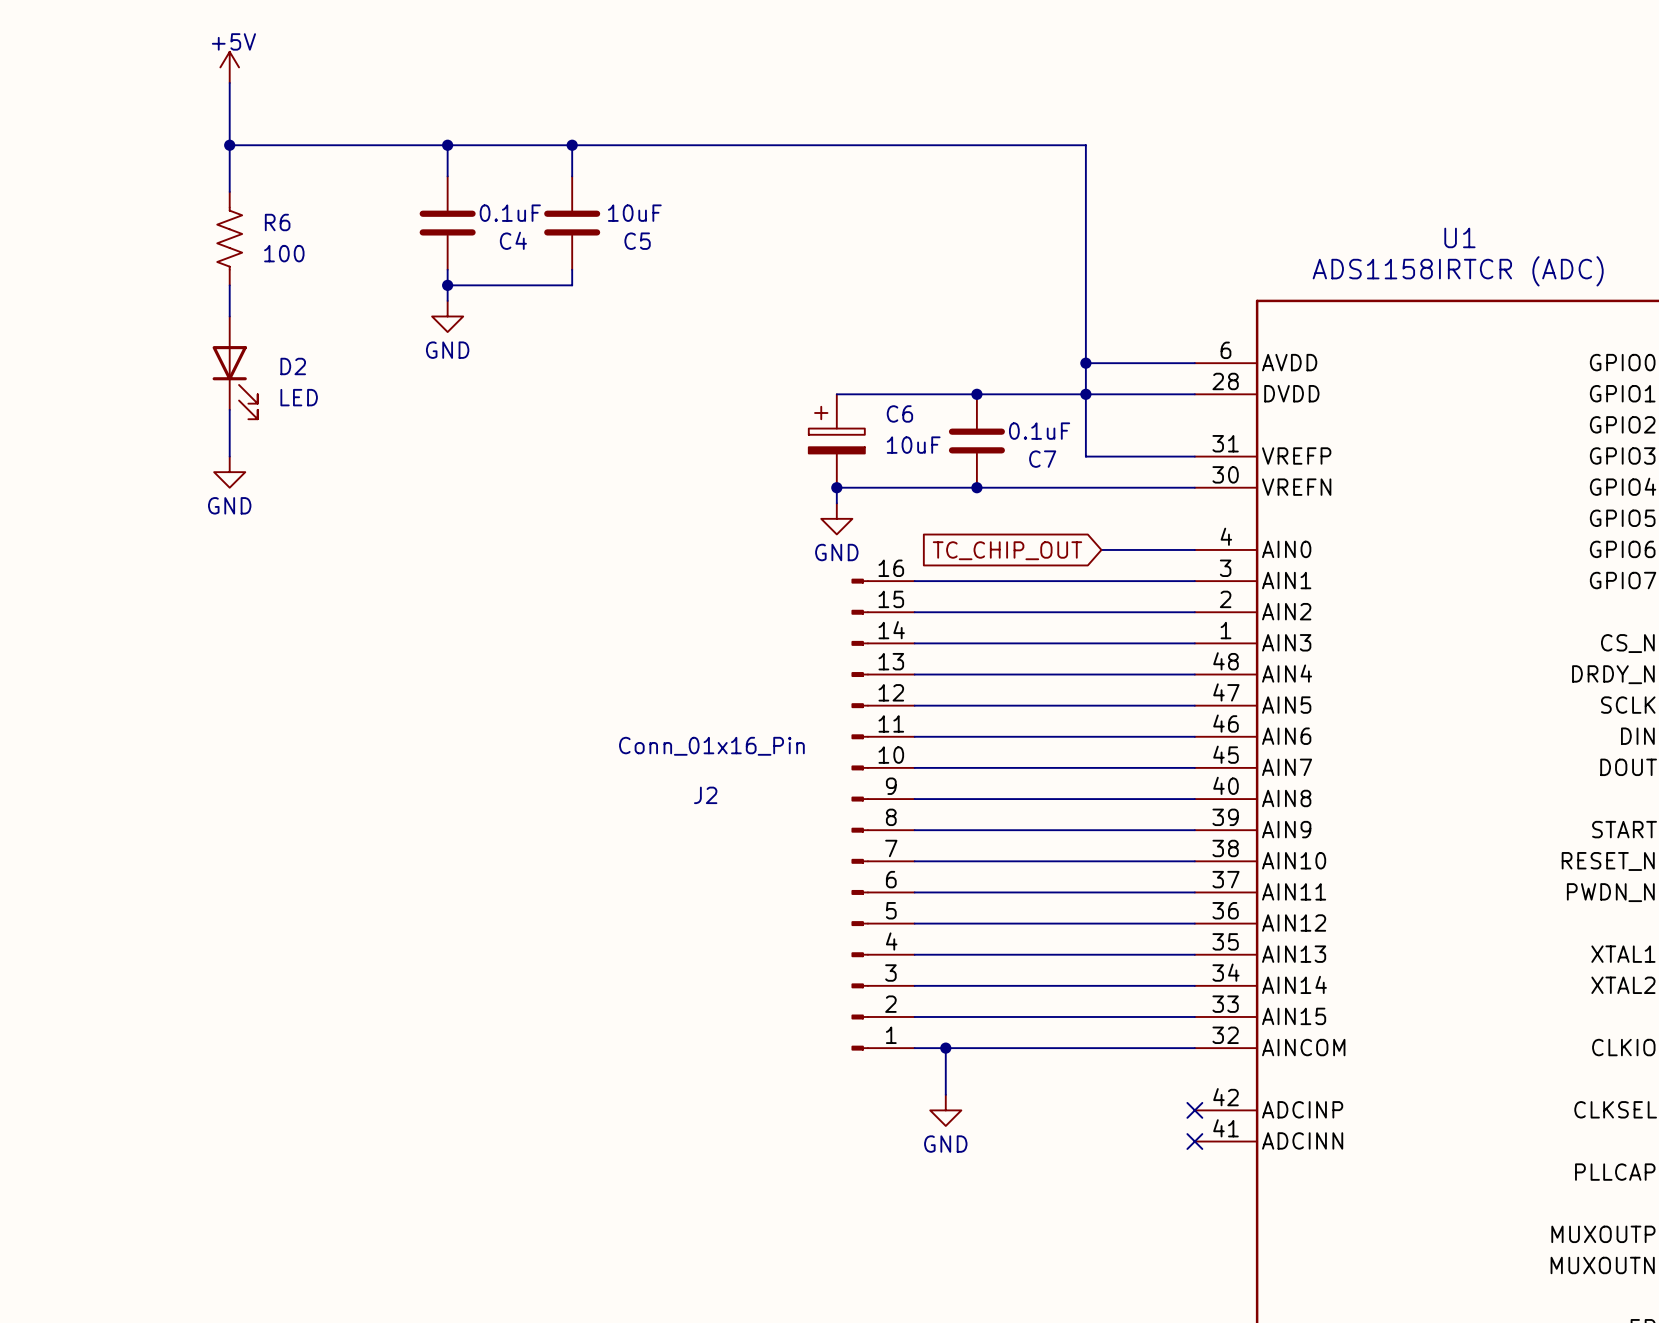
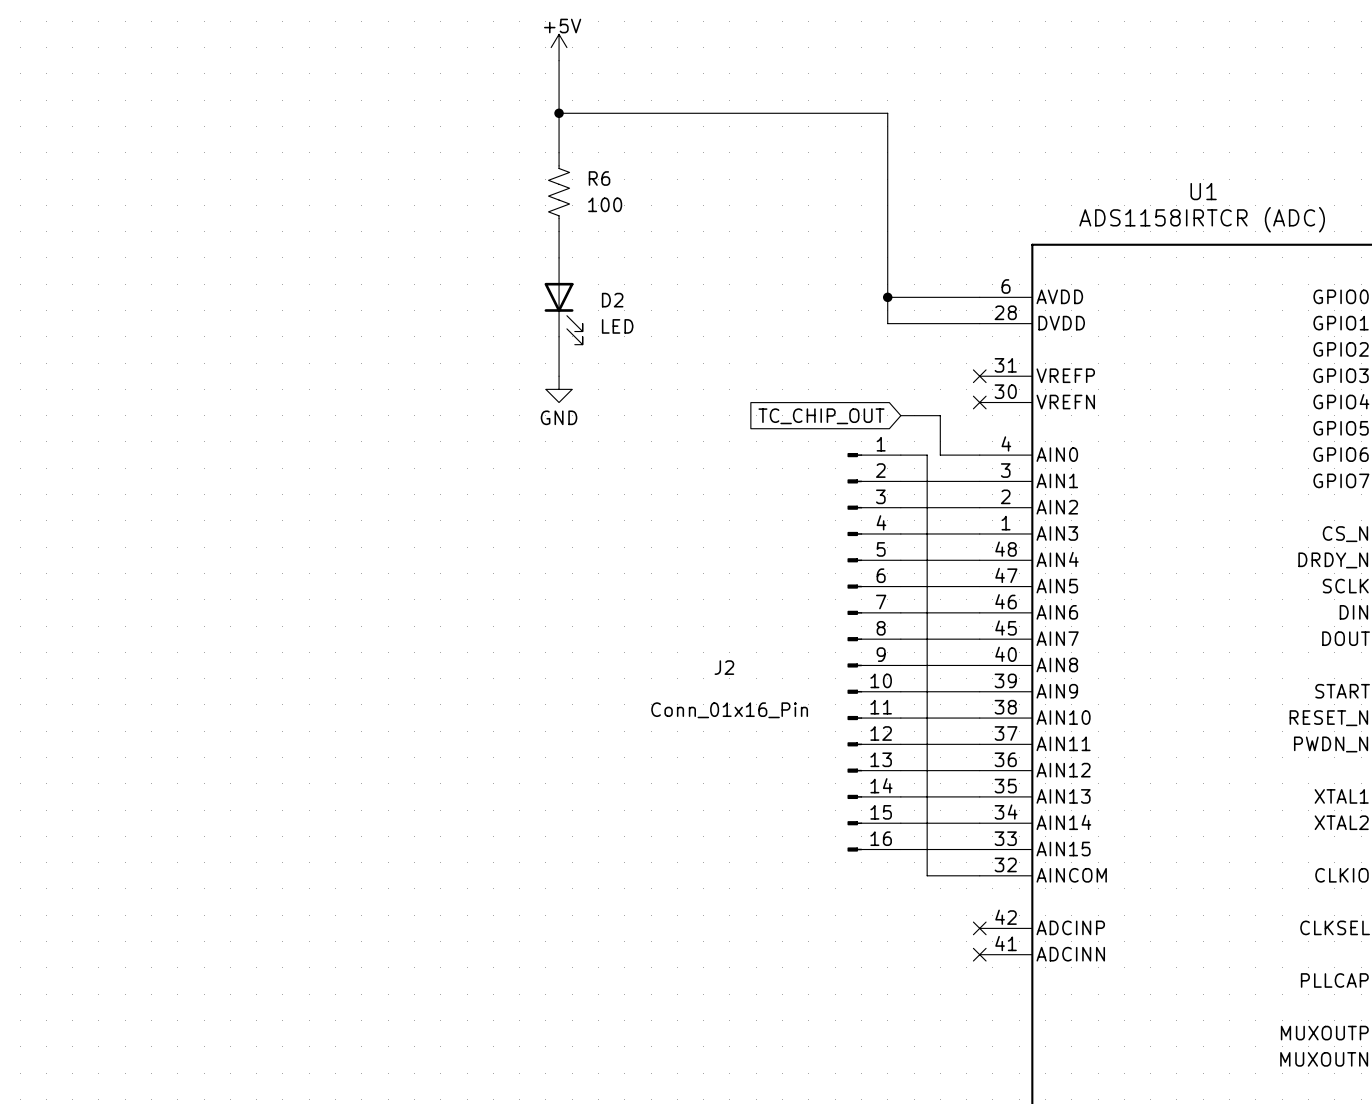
power symbol: +5V (229, 67) -> none
power symbol: none -> +5V (559, 47)
wire: (229, 82) (229, 191) -> none
wire: none -> (559, 60) (559, 152)
wire: (229, 145) (696, 145) -> none
junction: (229, 145) -> none
wire: (447, 145) (447, 176) -> none
junction: (447, 145) -> none
wire: (572, 145) (572, 176) -> (559, 231) (559, 257)
junction: (572, 145) -> none
junction: none -> (559, 113)
C4: 0.1uF (447, 223) -> none
C5: 10uF (572, 223) -> none
R6 position: (229, 238) -> (559, 192)
wire: (447, 269) (447, 300) -> none
wire: (572, 269) (572, 285) (447, 285) -> none
wire: (229, 285) (229, 316) -> none
junction: (447, 285) -> none
power symbol: GND (447, 316) -> none
D2 position: (235, 367) -> (563, 301)
wire: (836, 394) (1085, 394) (1085, 456) (1194, 456) -> none
junction: (976, 394) -> none
junction: (1085, 394) -> none
wire: (229, 409) (229, 456) -> none
wire: none -> (559, 336) (559, 376)
C6: 10uF (836, 441) -> none
C7: 0.1uF (976, 441) -> none
no-connect mark: none -> (979, 376)
power symbol: GND (229, 472) -> none
power symbol: none -> GND (559, 389)
junction: (836, 487) -> none
junction: (976, 487) -> none
wire: (1194, 487) (836, 487) (836, 503) -> none
no-connect mark: none -> (979, 402)
power symbol: GND (836, 518) -> none
wire: (1132, 549) (1148, 549) -> (900, 415) (940, 415) (940, 455)
global label position: TC_CHIP_OUT (1007, 550) -> TC_CHIP_OUT (821, 416)
wire: (914, 581) (1101, 581) -> none
wire: (914, 612) (1101, 612) -> none
wire: (914, 643) (1101, 643) -> none
wire: (914, 674) (1101, 674) -> none
wire: (914, 705) (1101, 705) -> none
wire: (914, 736) (1101, 736) -> none
wire: (914, 767) (1101, 767) -> none
wire: (914, 799) (1101, 799) -> none
J2 flip: as is (860, 814) -> up-down (854, 652)
wire: (914, 830) (1101, 830) -> none
wire: (914, 861) (1101, 861) -> none
wire: (914, 892) (1101, 892) -> none
wire: (914, 923) (1101, 923) -> none
wire: (914, 954) (1101, 954) -> none
wire: (914, 985) (1101, 985) -> none
wire: (914, 1016) (1101, 1016) -> none
wire: (914, 1048) (1132, 1048) -> (927, 455) (927, 875)
wire: (945, 1048) (945, 1094) -> none
junction: (945, 1048) -> none
power symbol: GND (945, 1110) -> none

